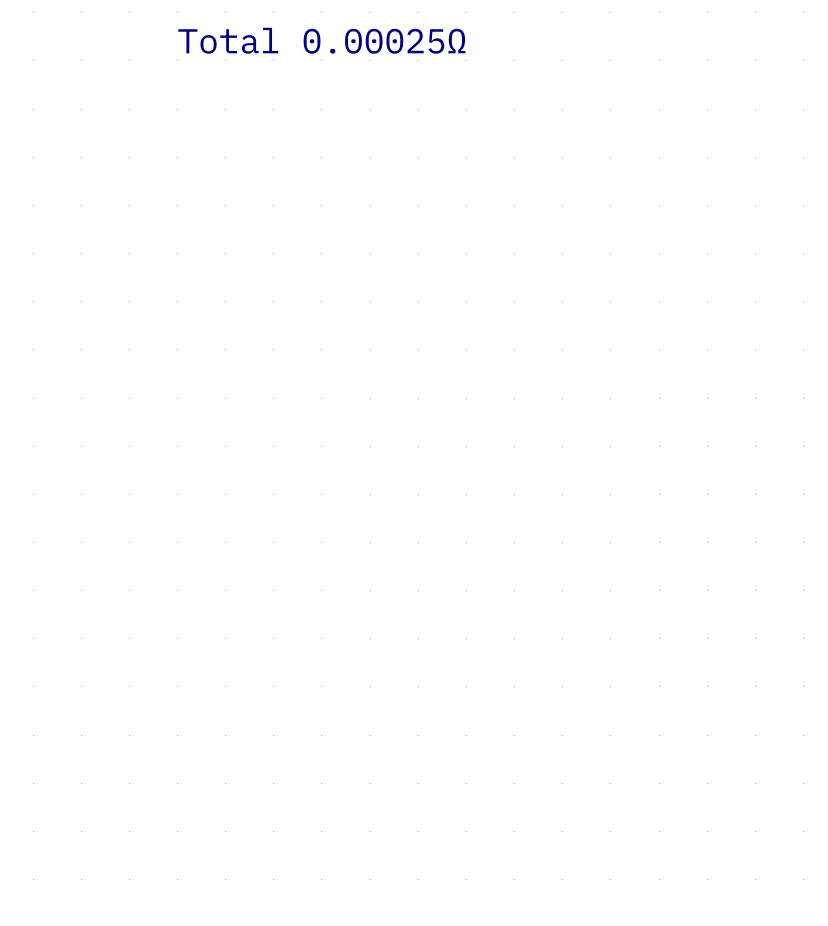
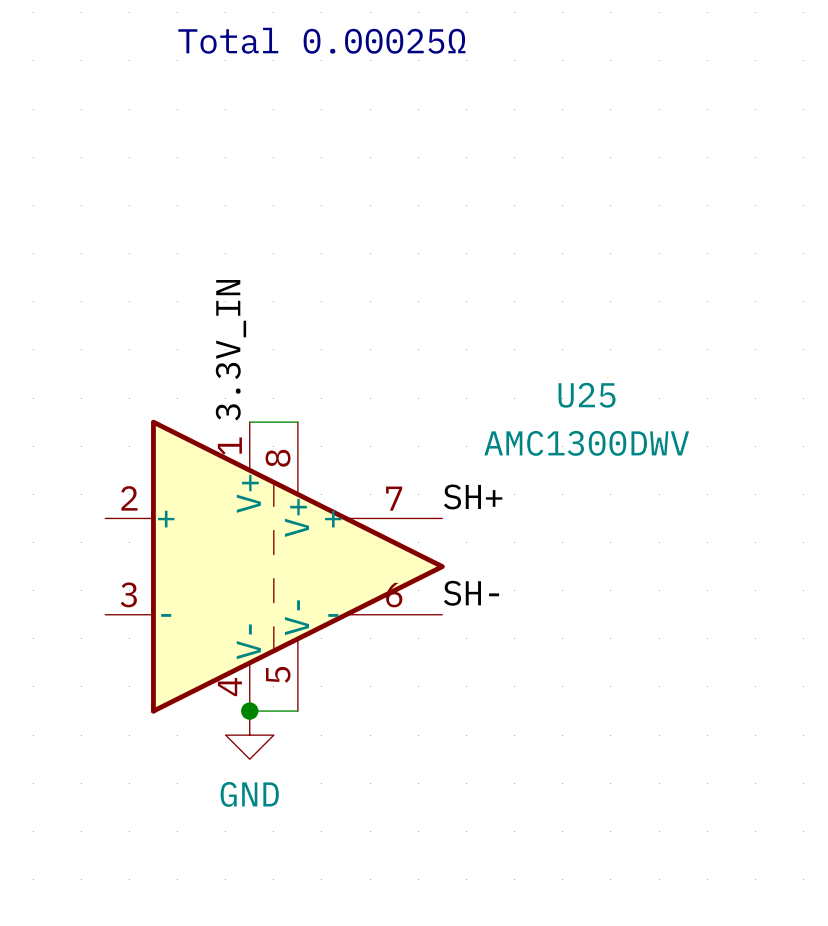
label: none -> 3.3V_IN (230, 350)
wire: none -> (249, 422) (297, 422)
label: none -> SH+ (473, 496)
U25: none -> AMC1300DWV (275, 566)
label: none -> SH- (471, 593)
wire: none -> (249, 711) (297, 711)
junction: none -> (249, 711)
power symbol: none -> GND (249, 735)

